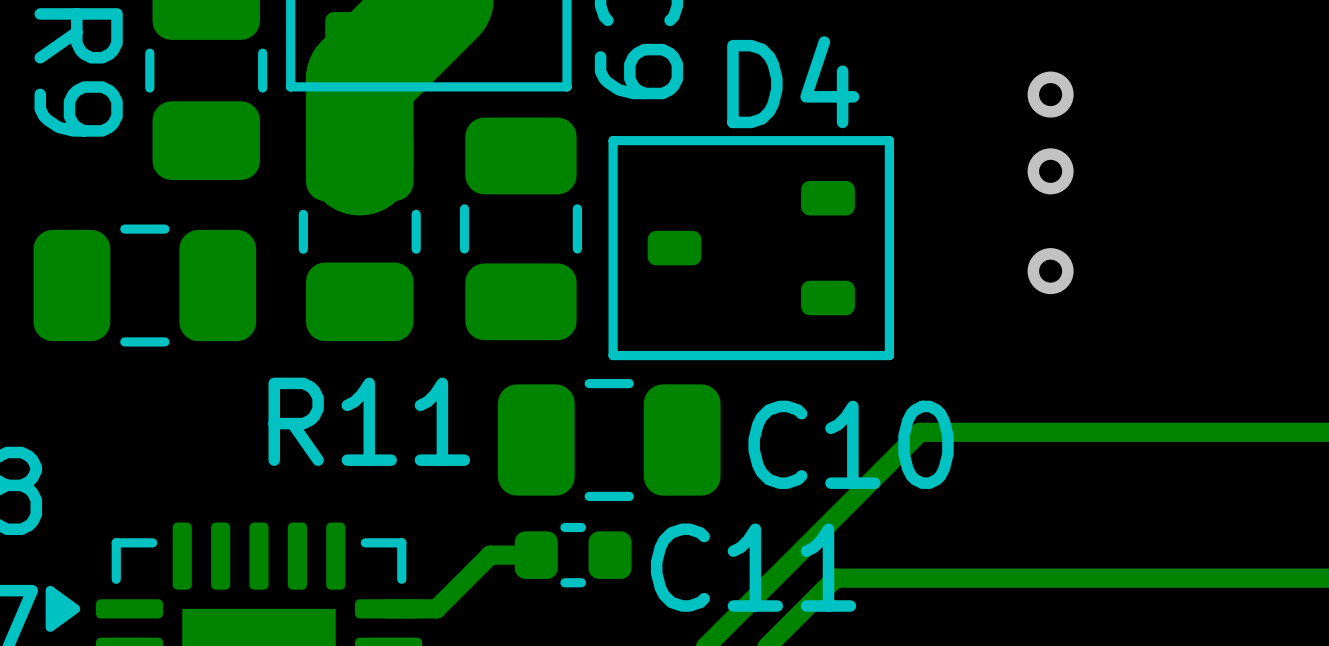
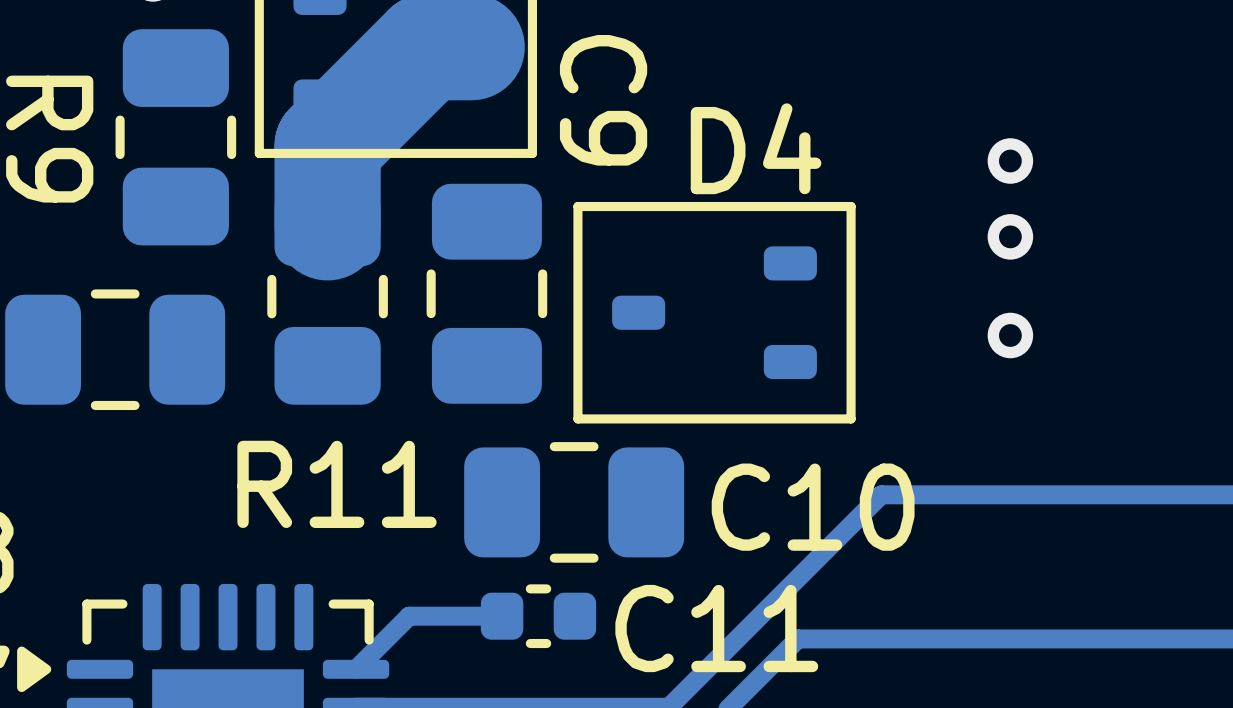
track: (490, 555) (436, 608) (388, 608) -> (456, 616) (409, 616) (356, 669)

